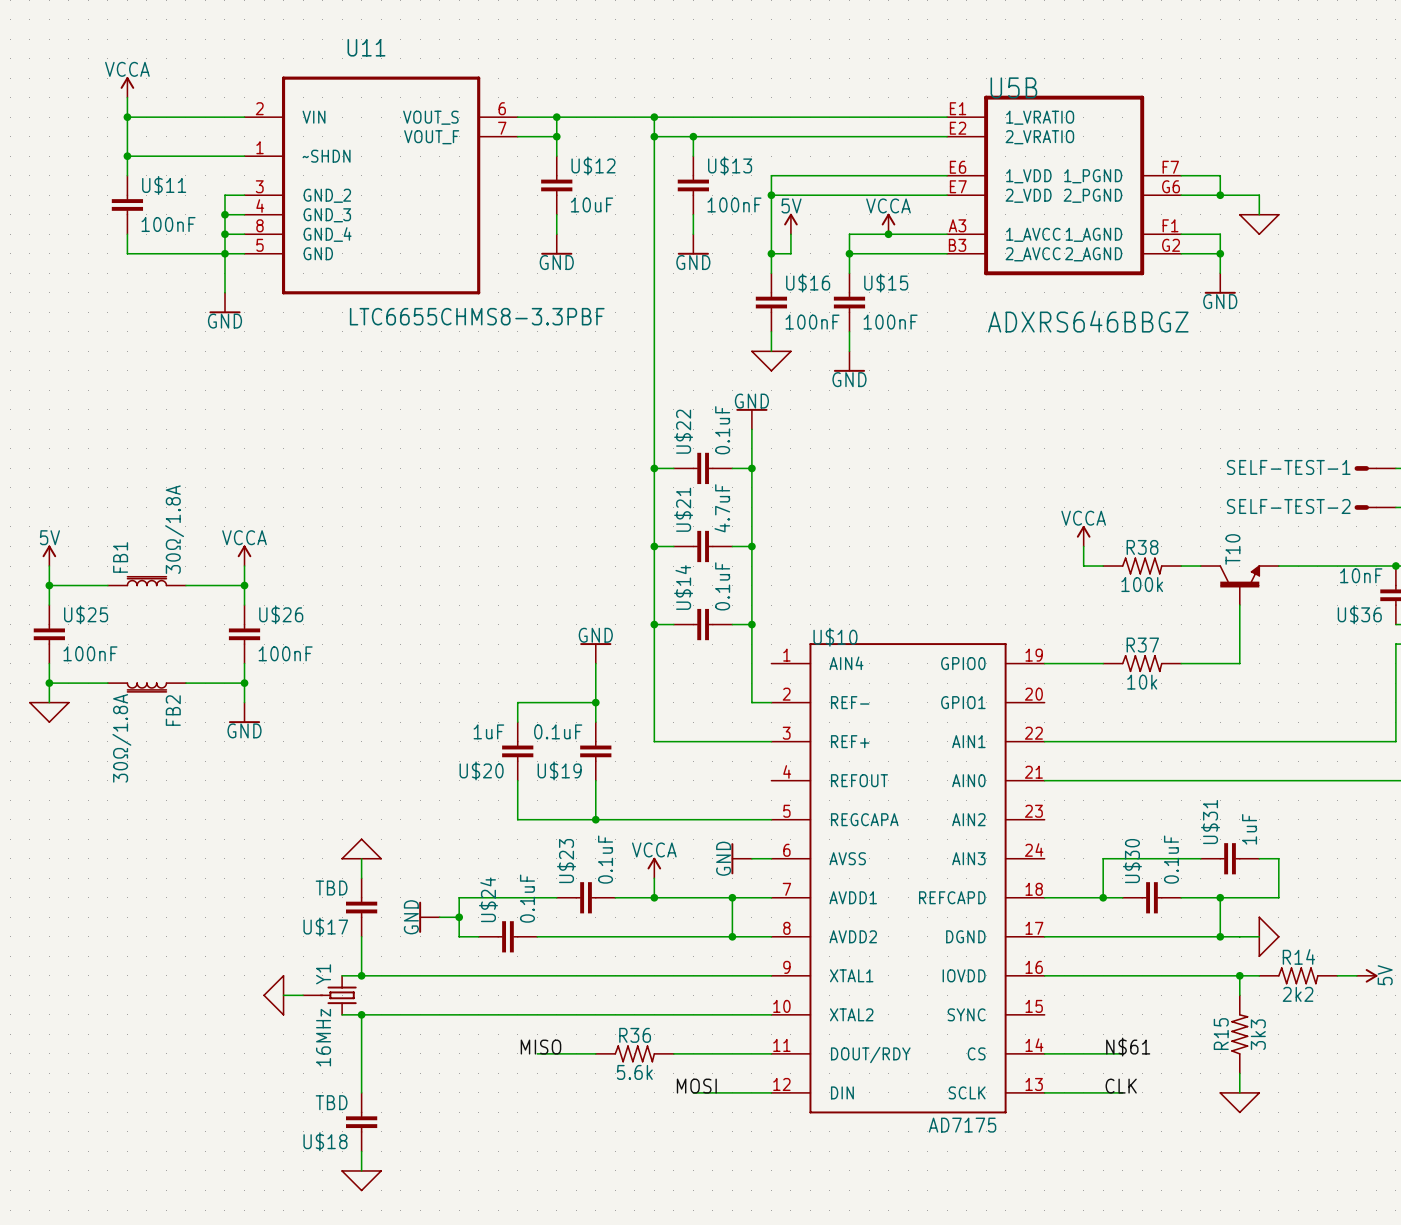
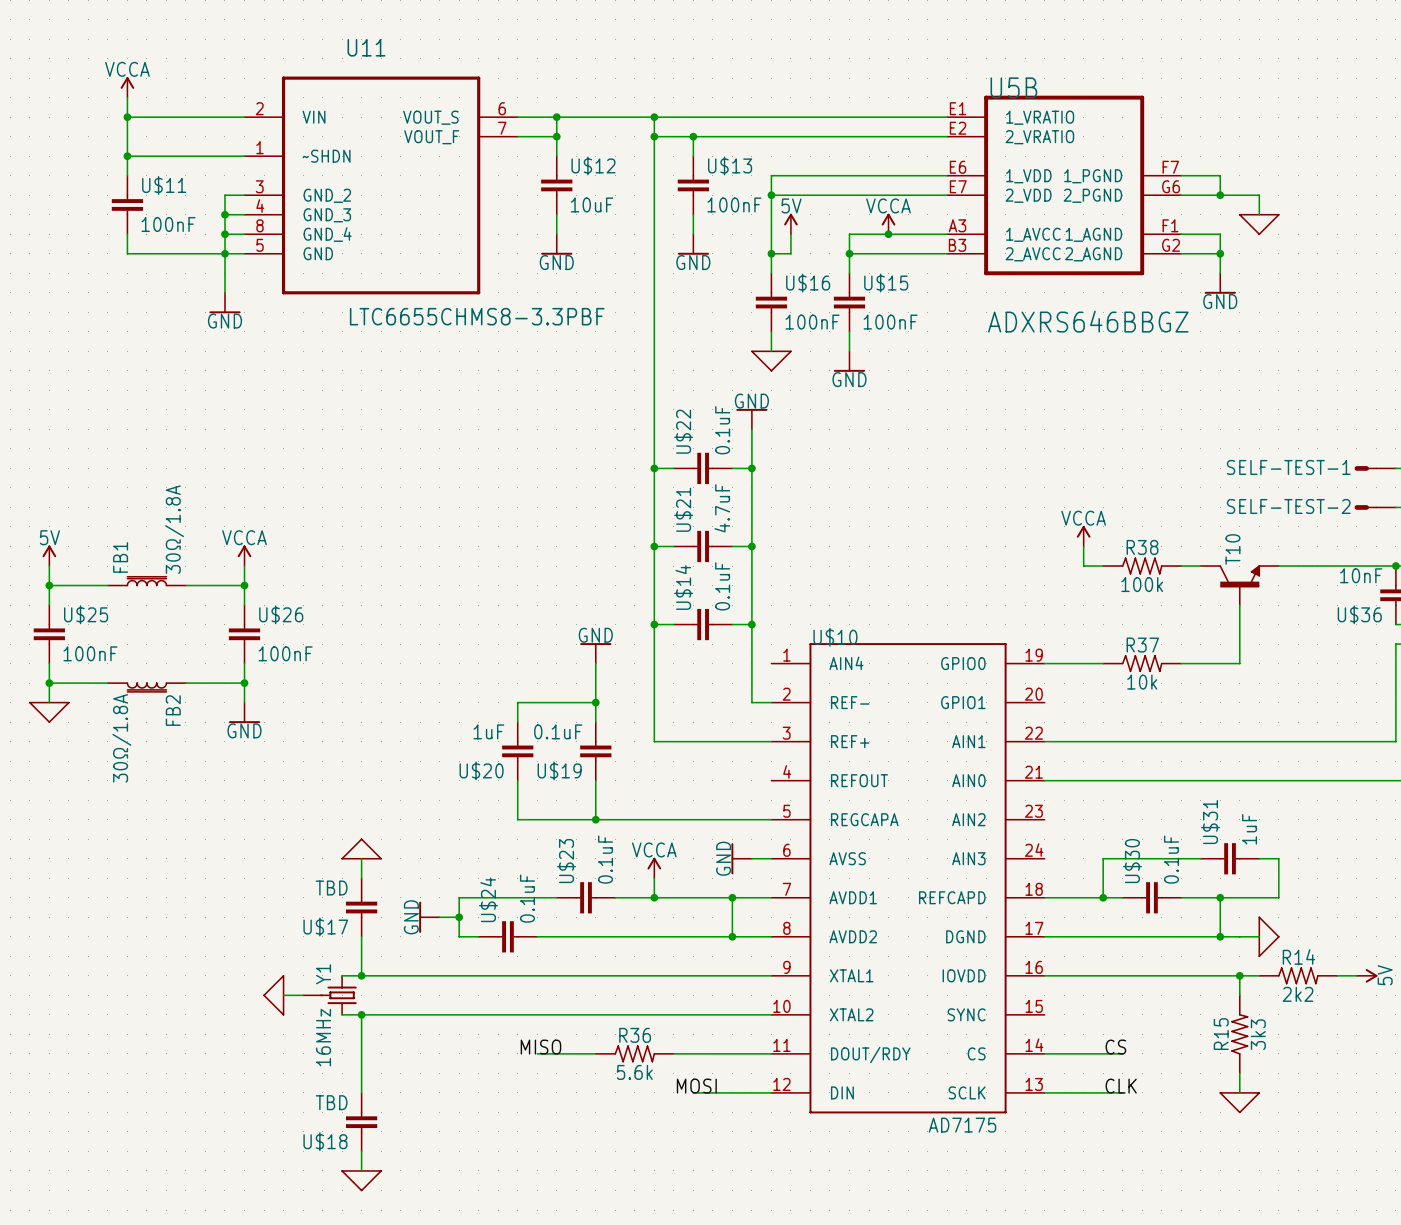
label: N$61 (1128, 1047) -> CS (1115, 1047)

